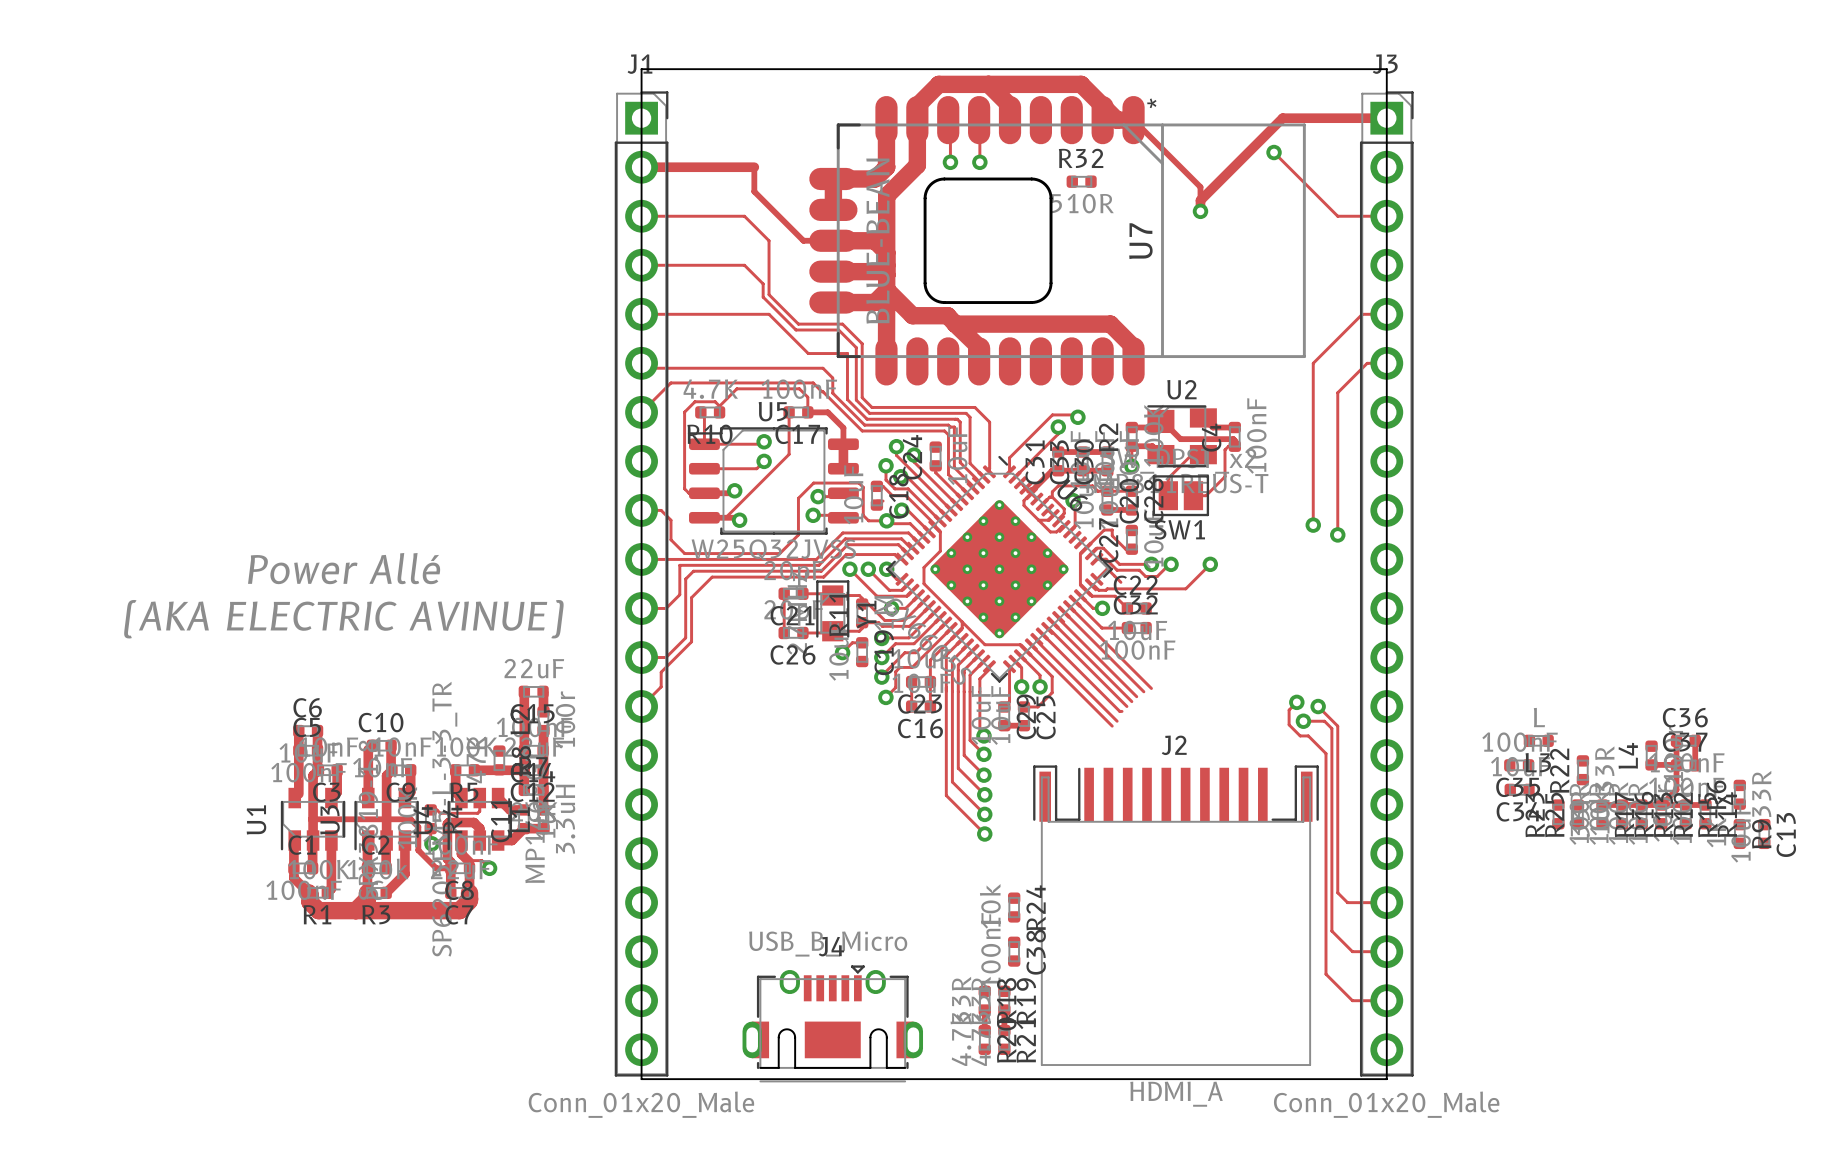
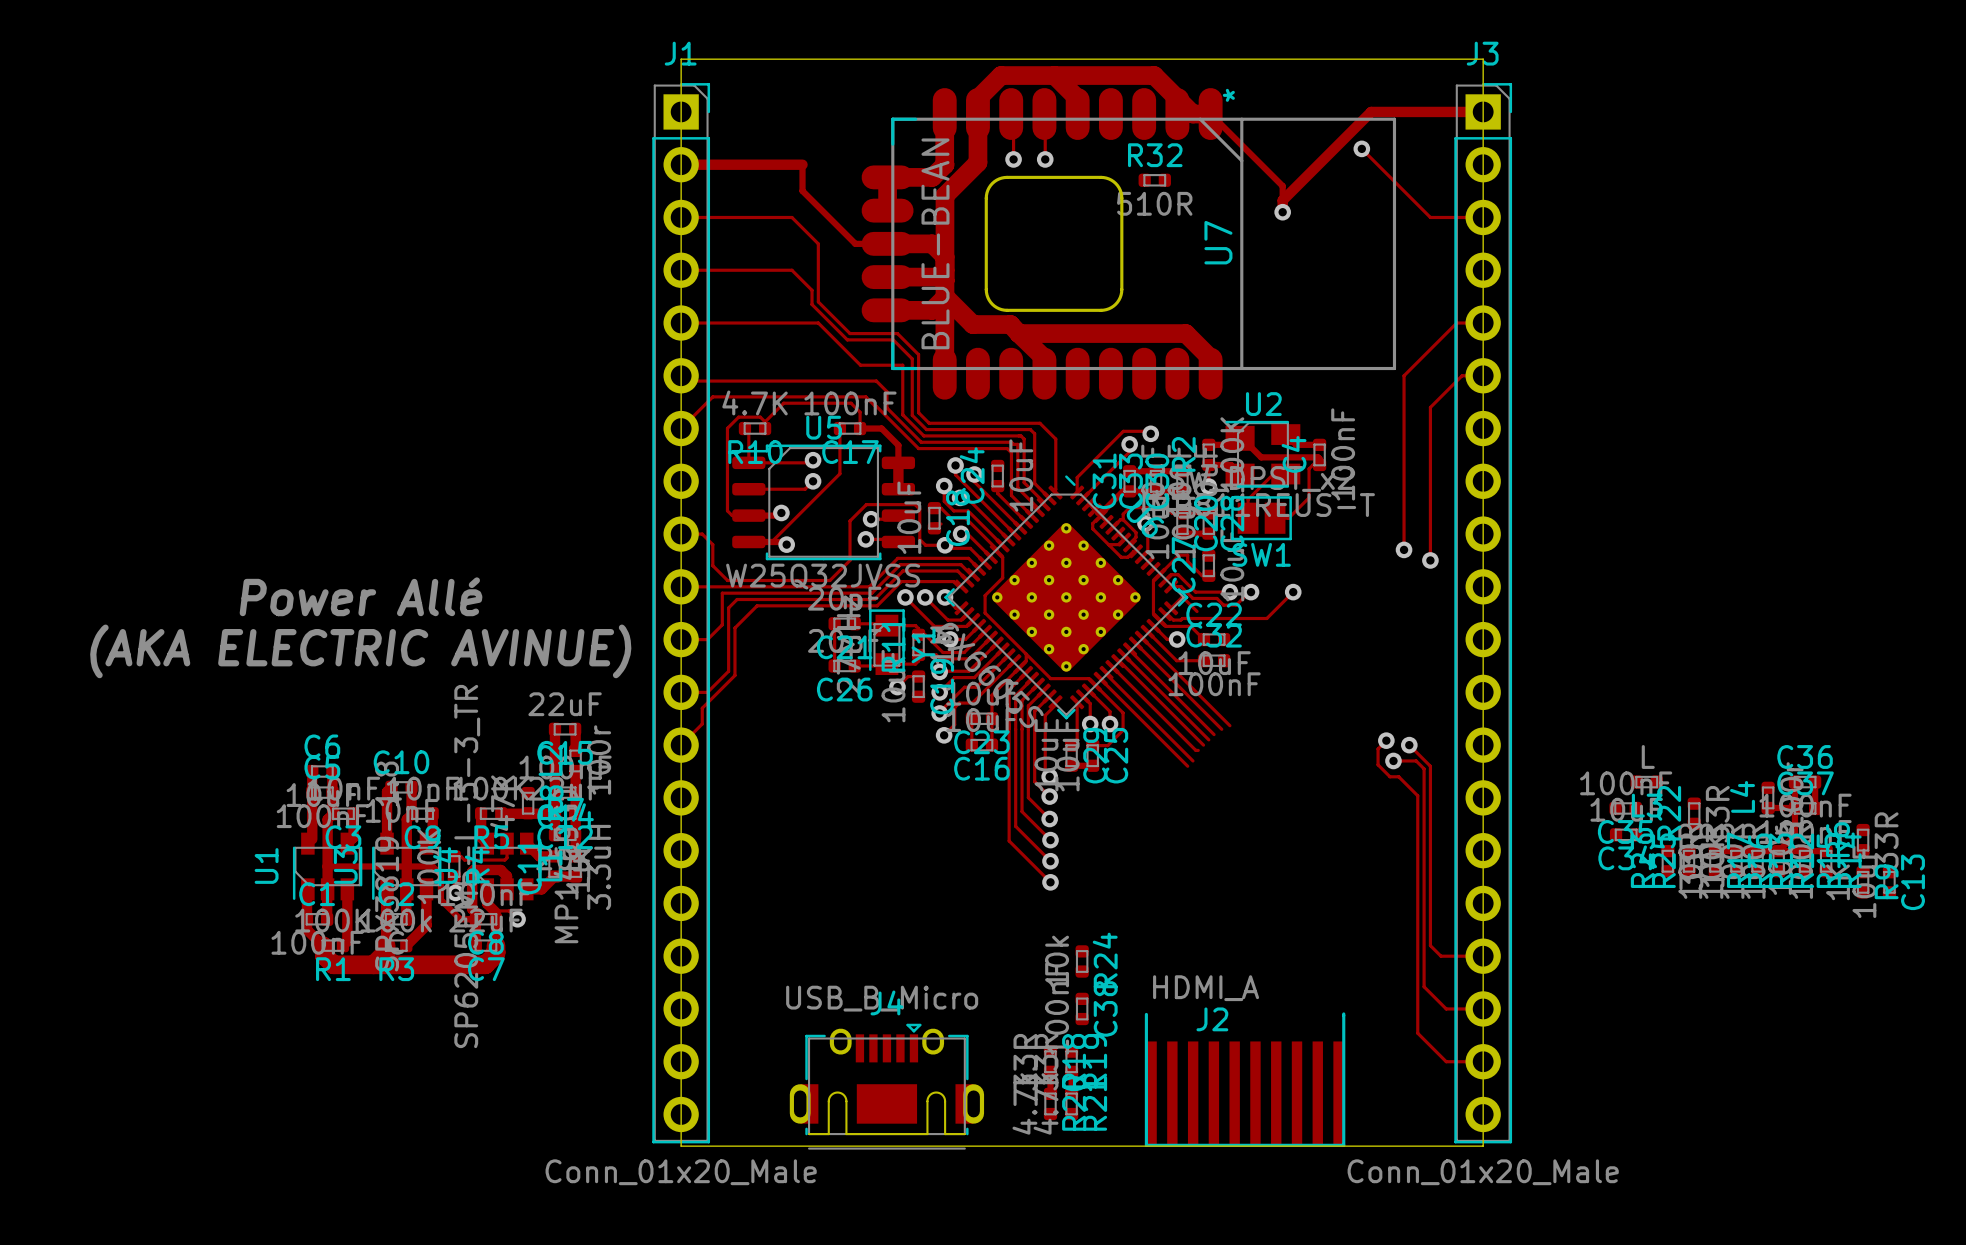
J2 name position: J2 (1174, 745) -> J2 (1212, 1019)
J2 footprint: [1033, 765, 1319, 1066] -> [1144, 1012, 1346, 1147]
J2 value position: HDMI_A (1176, 1094) -> HDMI_A (1206, 988)

